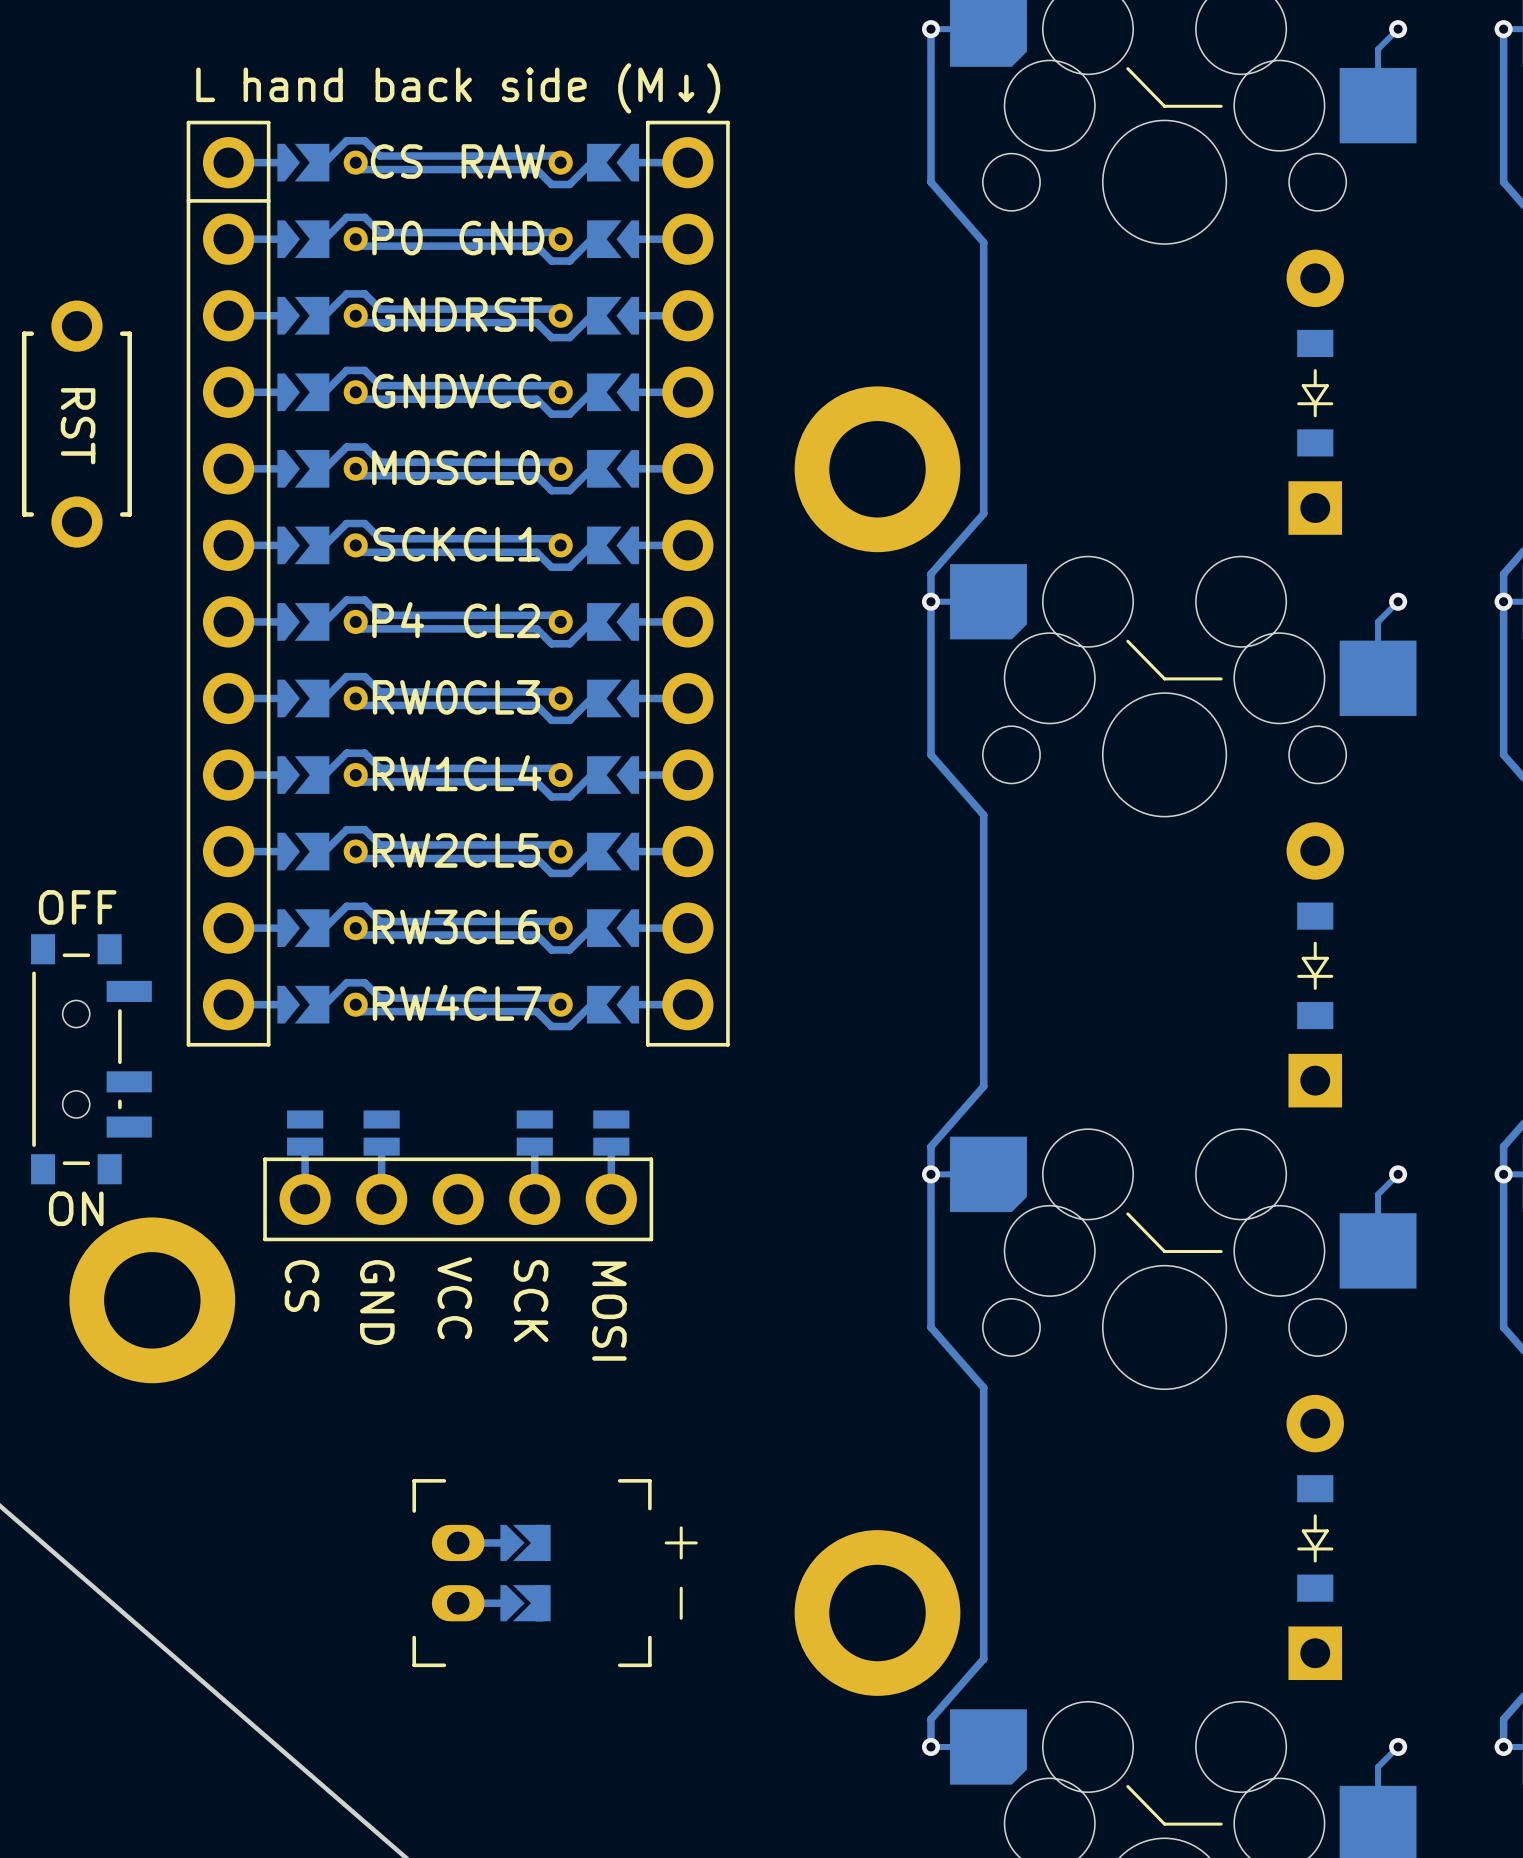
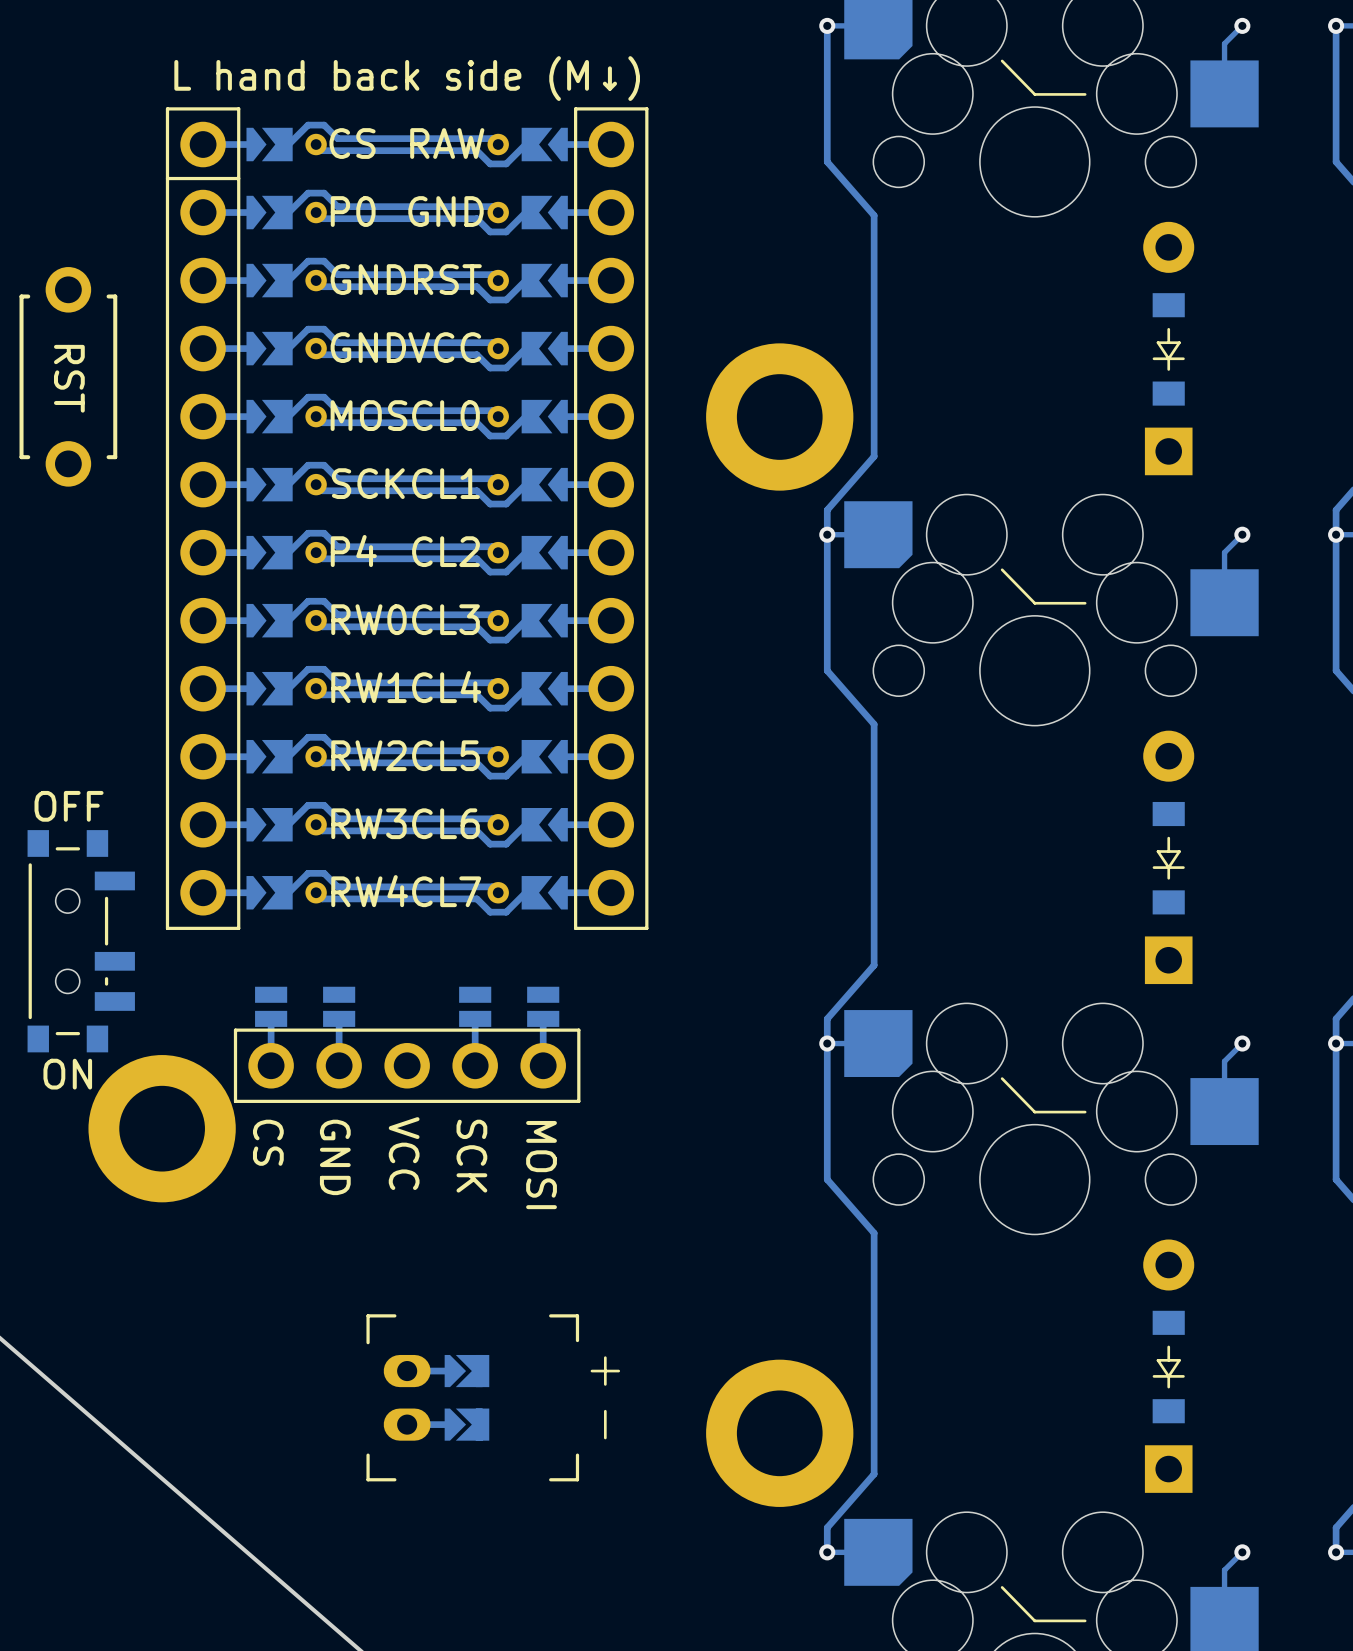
part position: (152, 1300) -> (162, 1128)

